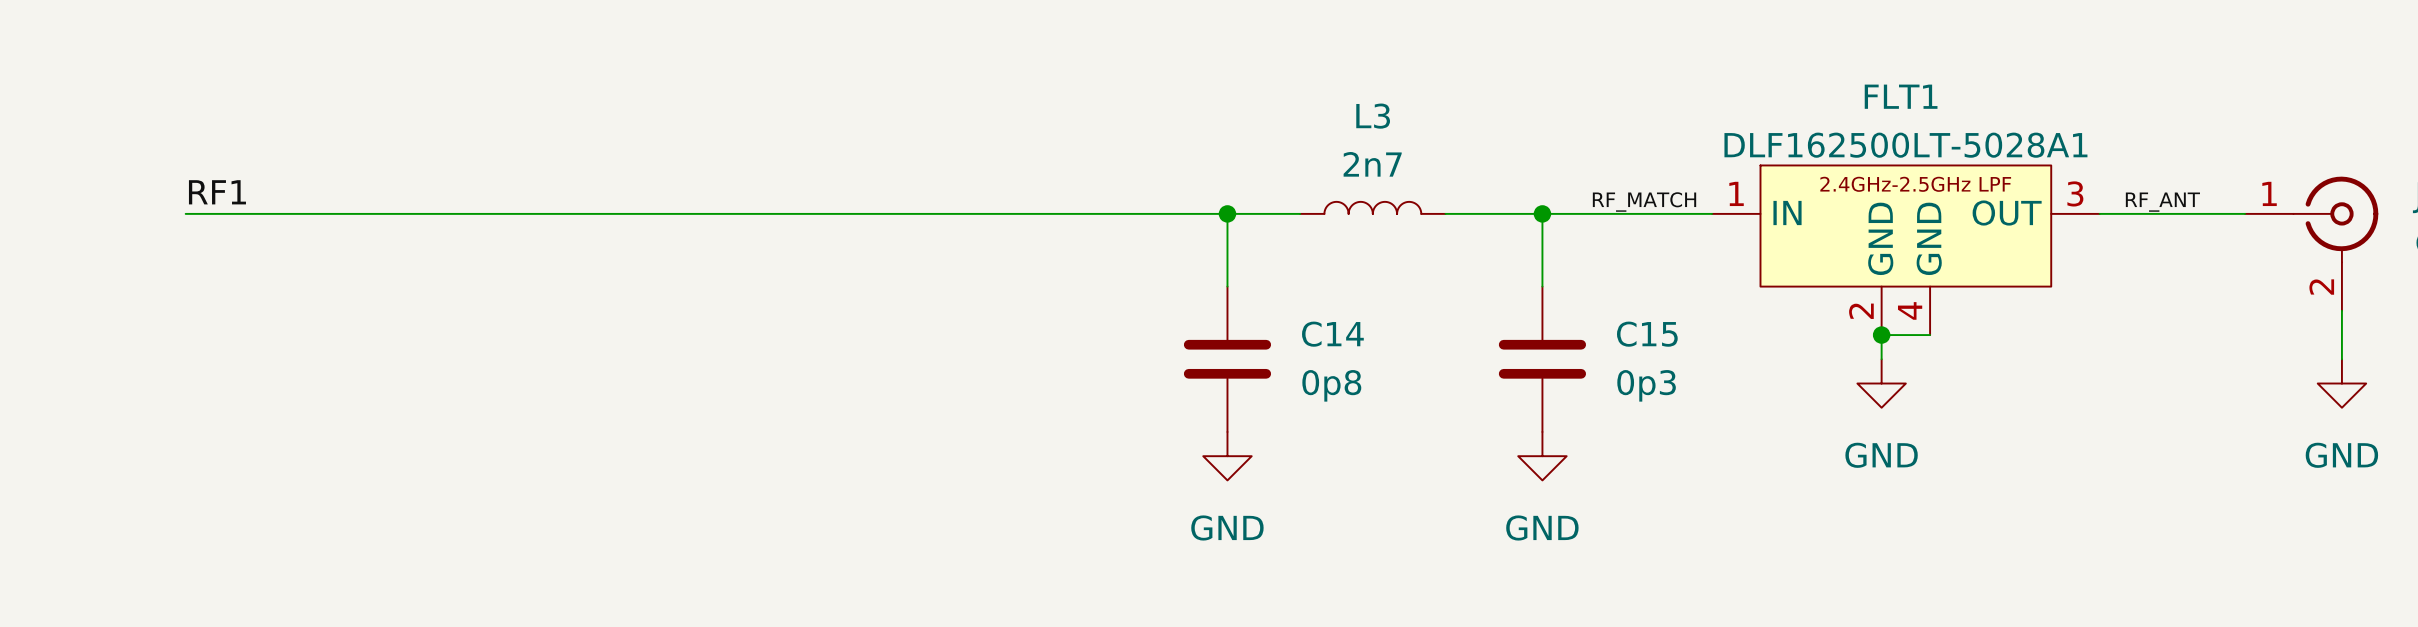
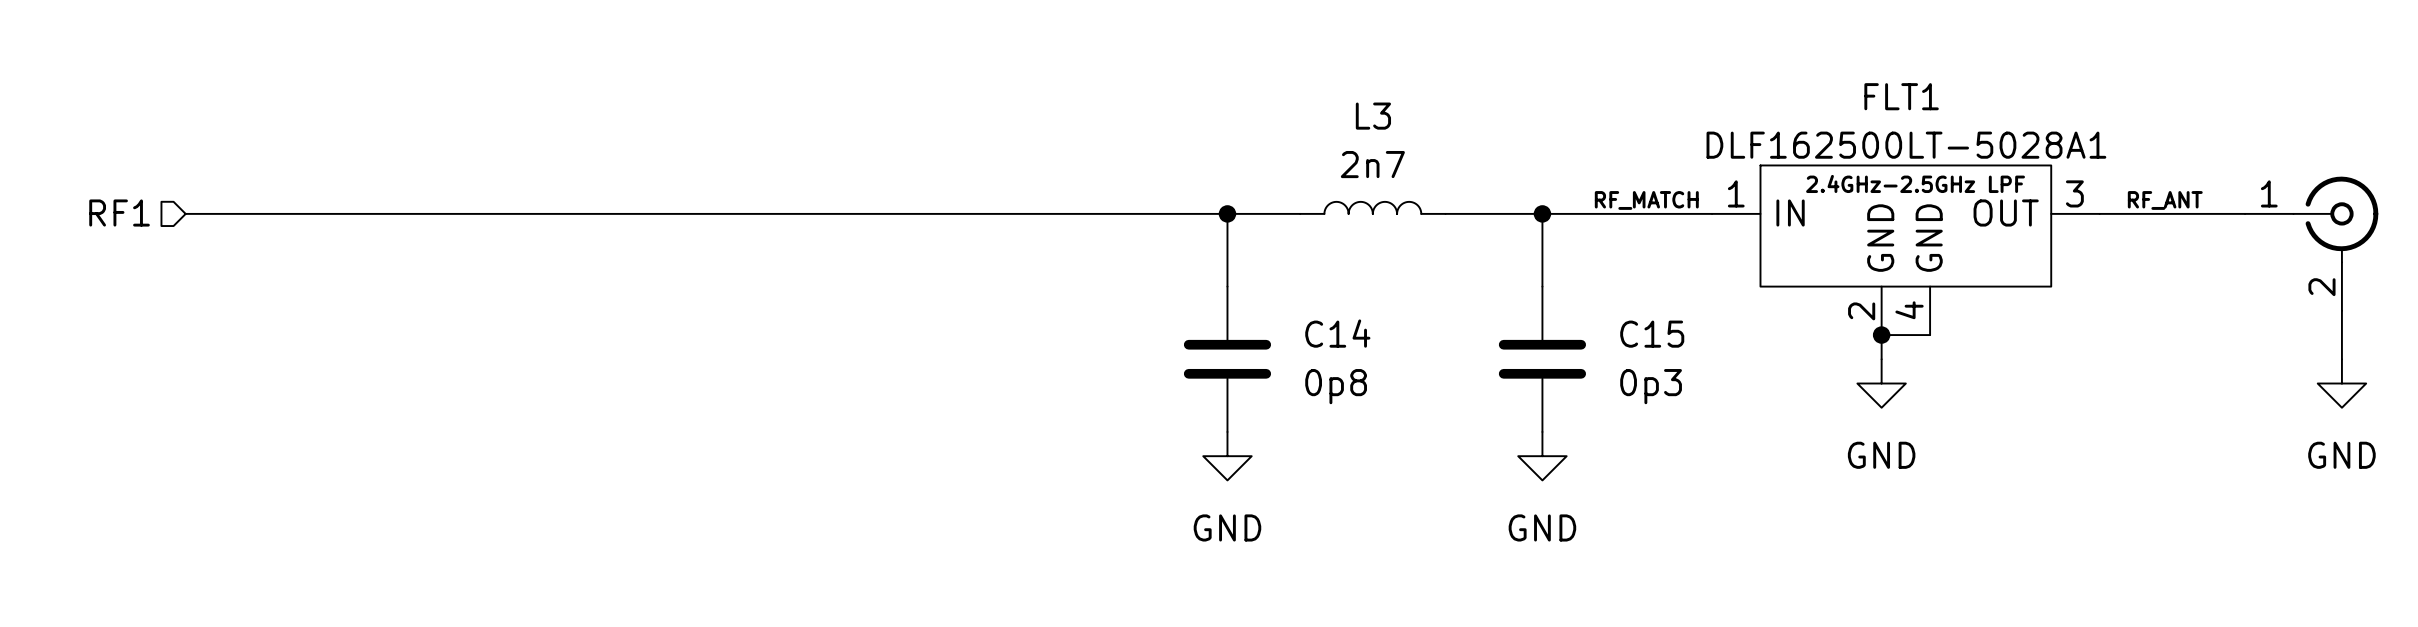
label: RF1 (217, 192) -> none
hierarchical label: none -> RF1 (119, 213)

